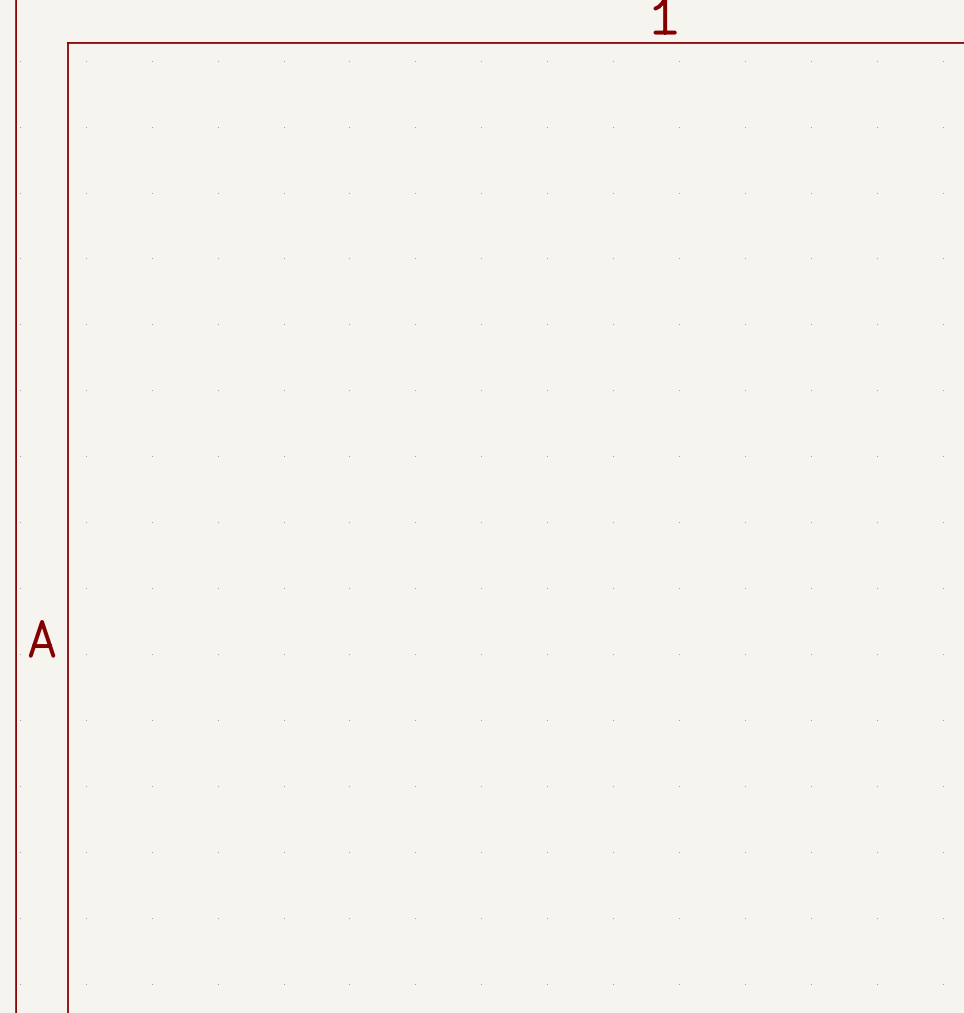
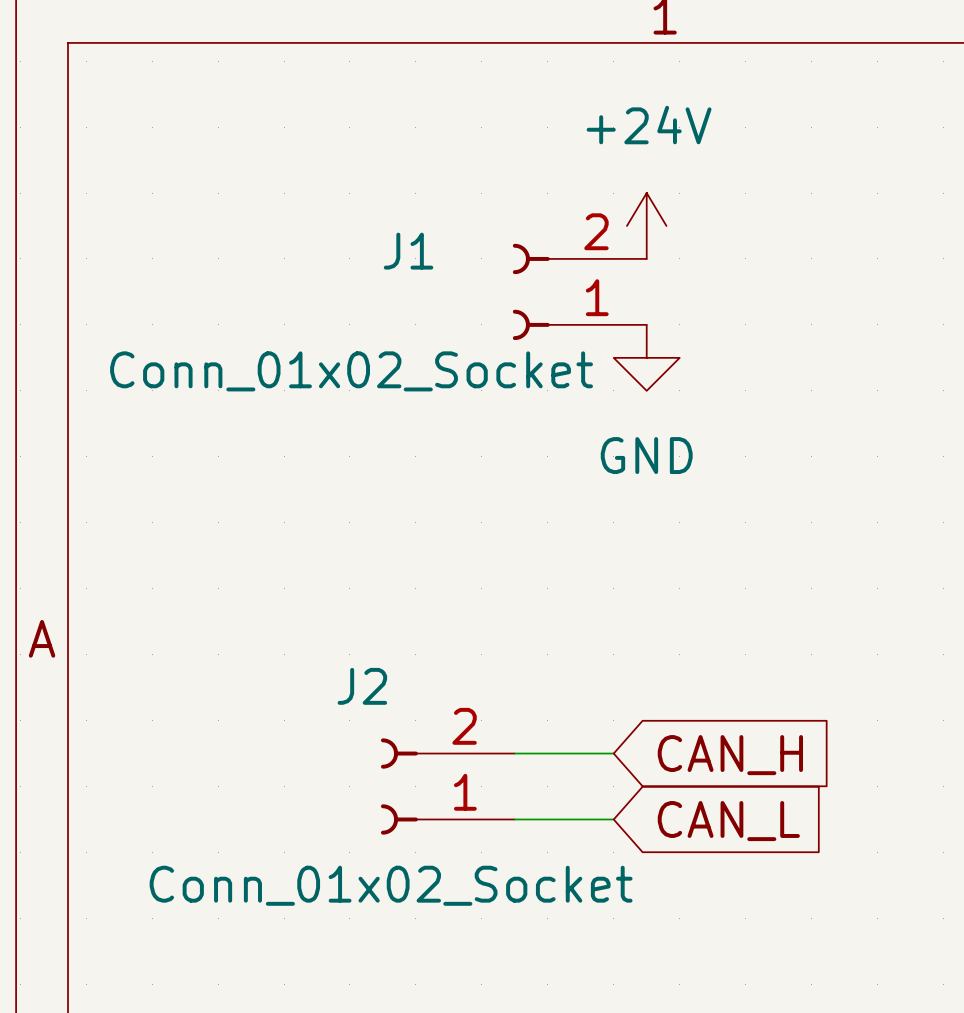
power symbol: none -> +24V (646, 225)
J1: none -> Conn_01x02_Socket (579, 291)
power symbol: none -> GND (646, 357)
wire: none -> (514, 753) (613, 753)
global label: none -> CAN_H (730, 755)
J2: none -> Conn_01x02_Socket (447, 786)
wire: none -> (514, 819) (613, 819)
global label: none -> CAN_L (728, 821)

